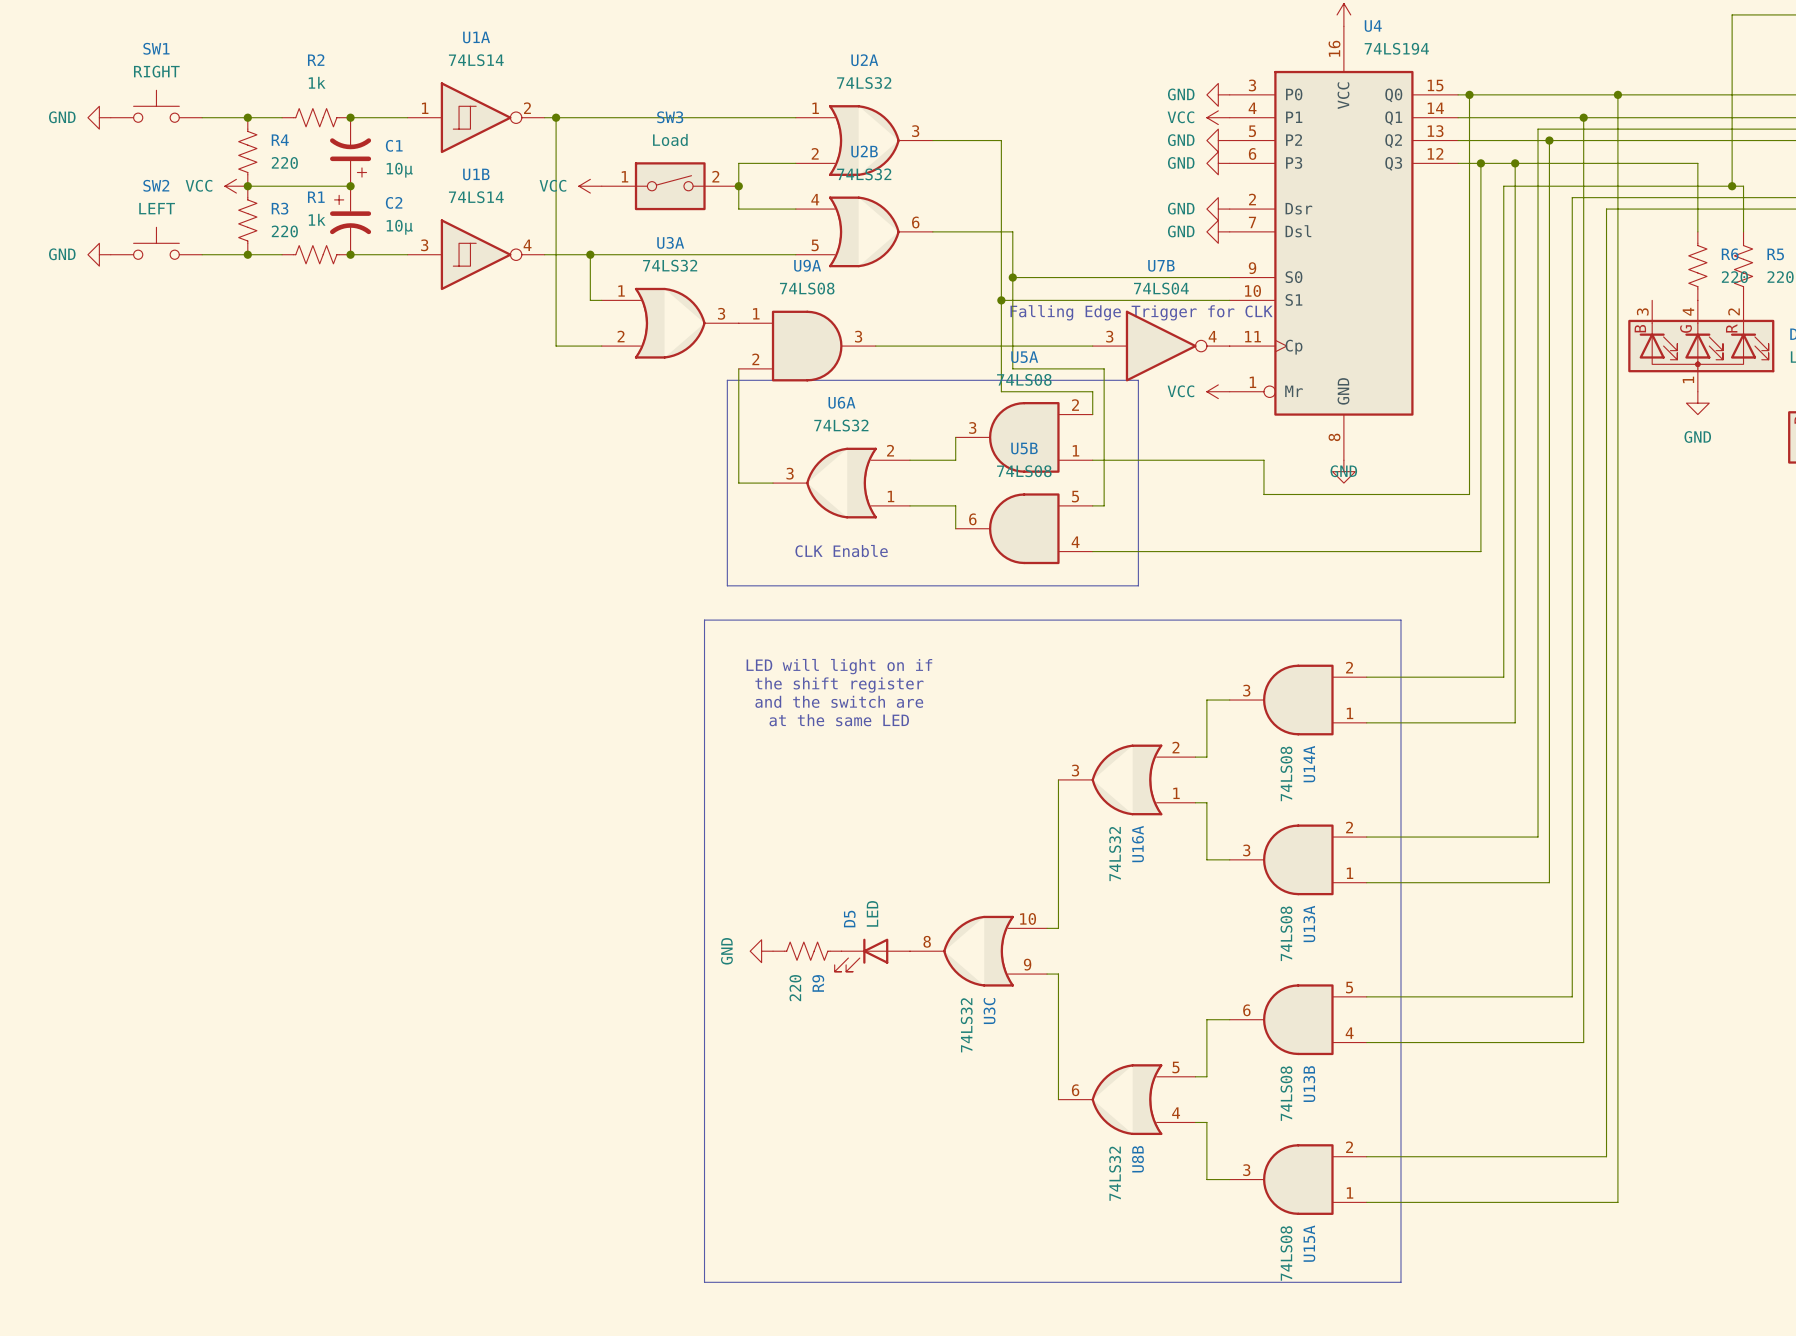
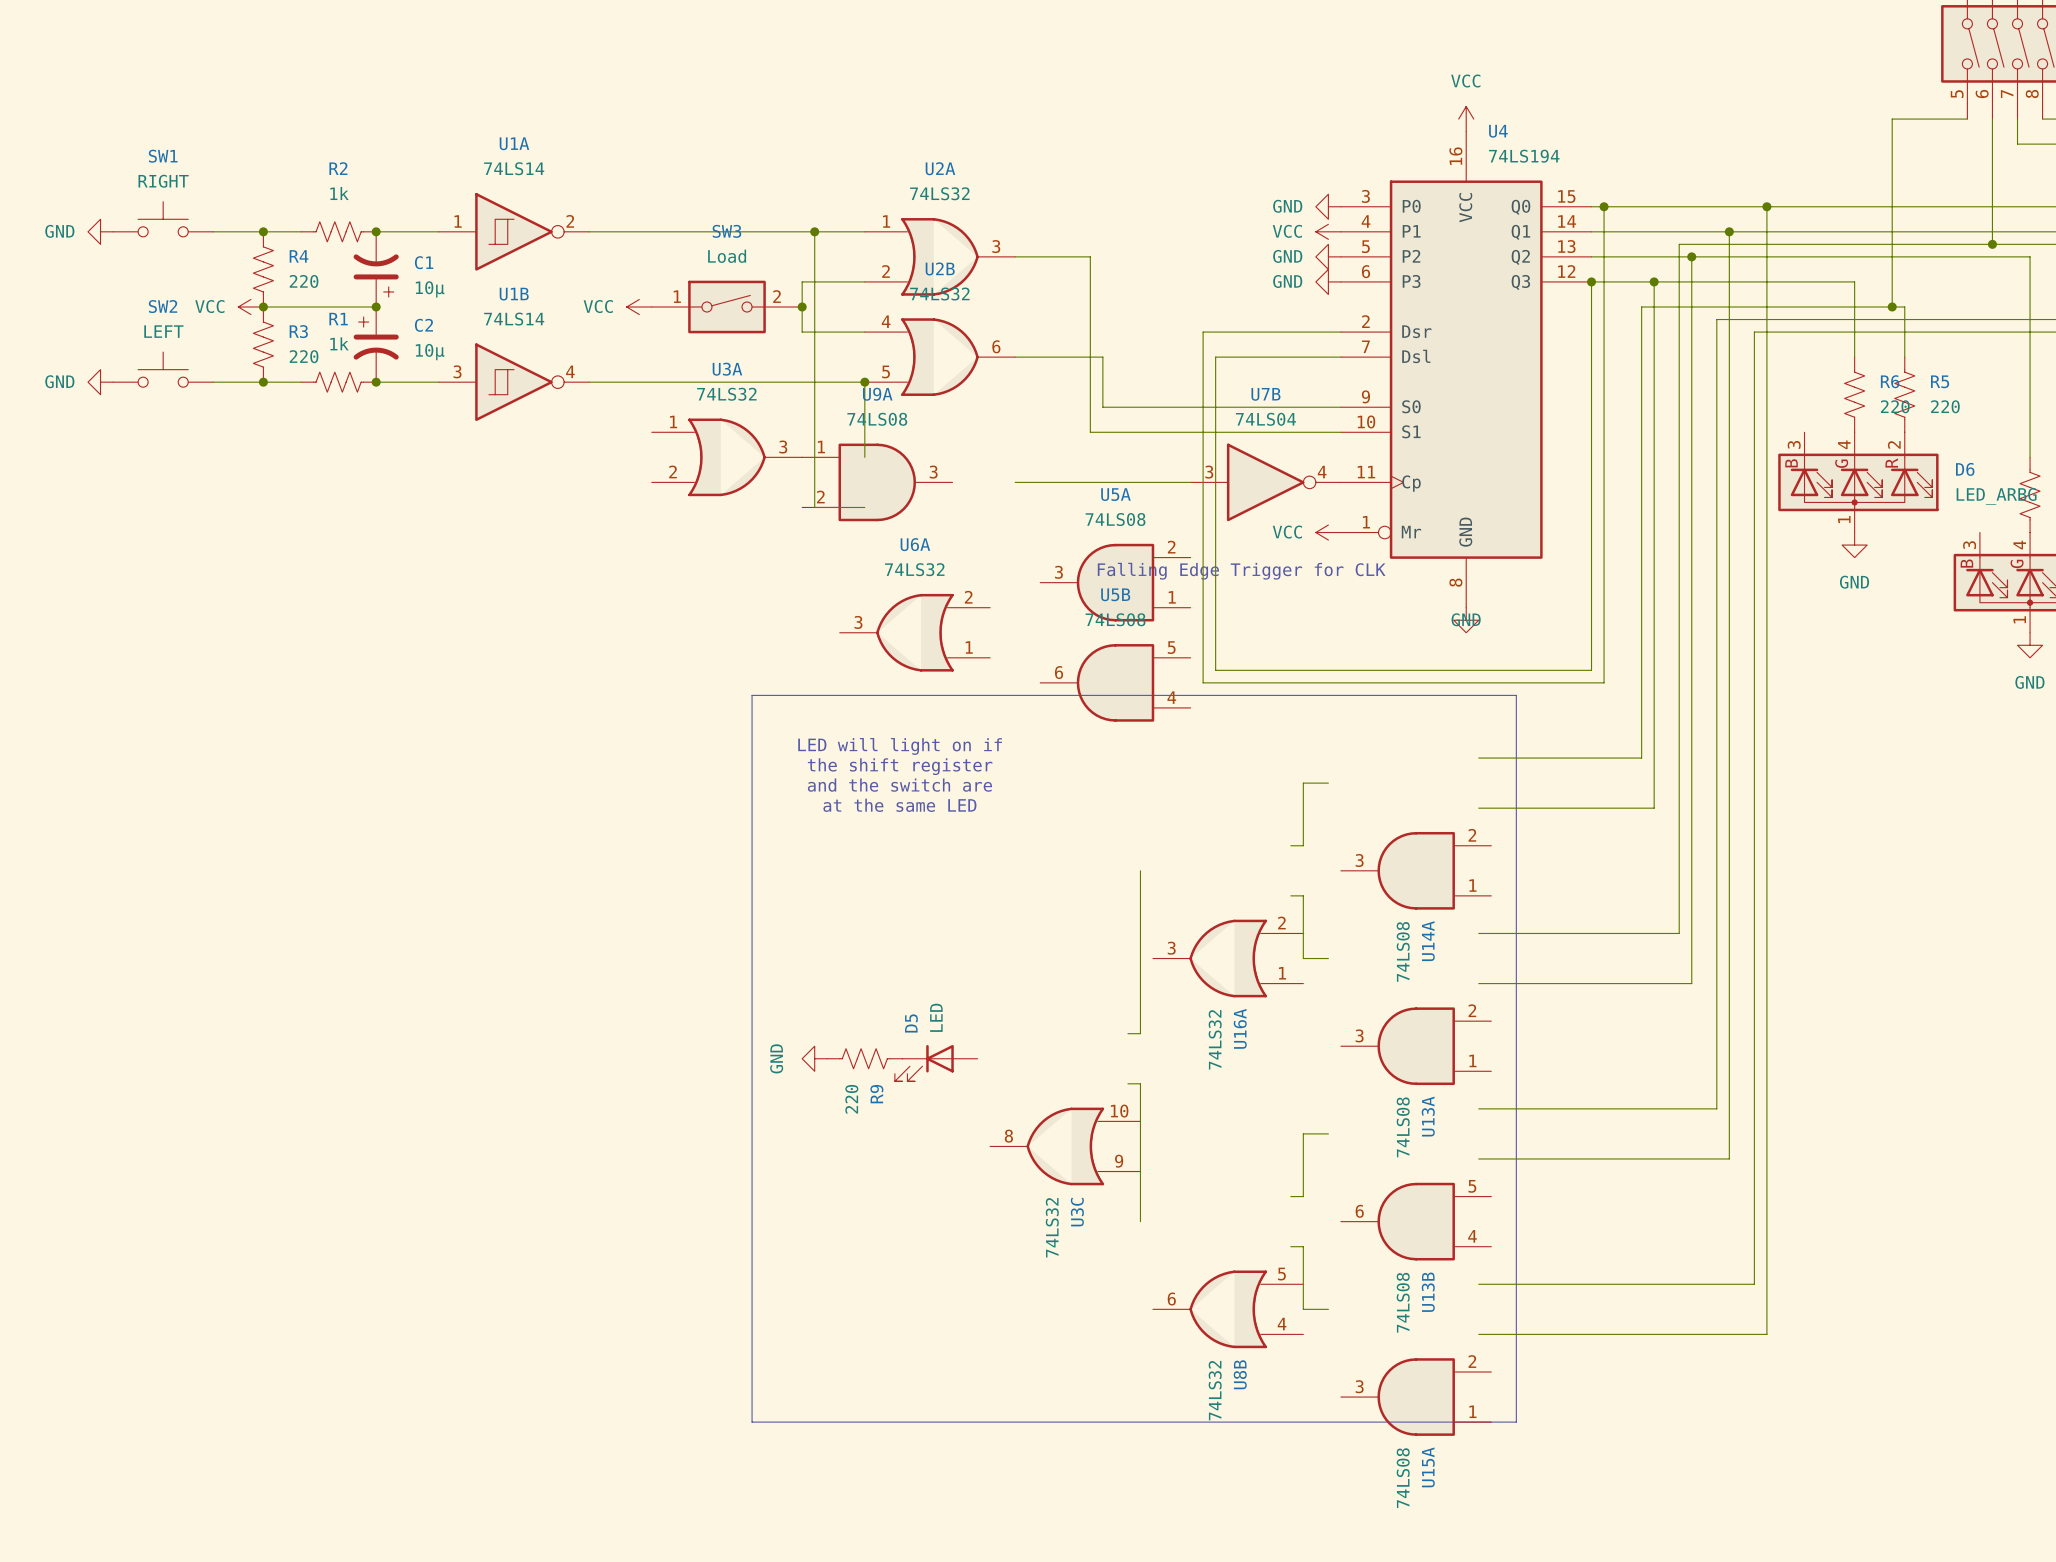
wire: (556, 117) (556, 346) (601, 346) -> none
junction: (556, 117) -> none
wire: none -> (814, 231) (814, 507) (864, 507)
junction: none -> (814, 231)
wire: none -> (1591, 281) (1591, 670) (1215, 670) (1215, 357) (1340, 357)
wire: (1480, 163) (1480, 551) (1092, 551) -> none
junction position: (1480, 163) -> (1591, 281)
power symbol: GND (1218, 209) -> none
power symbol: GND (1218, 231) -> none
wire: (590, 254) (590, 300) (601, 300) -> none
junction: (590, 254) -> none
wire: none -> (864, 382) (864, 457)
junction: none -> (864, 382)
wire: (1012, 277) (1012, 368) (1104, 368) -> (1340, 332) (1203, 332) (1203, 507)
junction: (1012, 277) -> none
wire: (1001, 300) (1001, 391) (1092, 391) (1092, 414) -> none
junction: (1001, 300) -> none
text position: Falling Edge Trigger for CLK (1141, 312) -> Falling Edge Trigger for CLK (1241, 571)
wire: (875, 346) (932, 346) -> none
wire: (738, 368) (738, 483) (773, 483) -> none
line: (727, 380) (1138, 380) (1138, 585) (727, 585) (727, 380) -> none
wire: (955, 437) (955, 460) (910, 460) -> none
wire: (1092, 460) (1263, 460) (1263, 494) (1469, 494) -> (1203, 657) (1203, 682) (1604, 682) (1604, 645)
wire: (910, 505) (955, 505) (955, 528) -> none
wire: (1092, 505) (1104, 505) -> none
text: CLK Enable (841, 551) -> none
wire: (1503, 597) (1503, 677) (1366, 677) -> (1641, 758) (1478, 758)
line: (704, 620) (1401, 620) (1401, 1282) (704, 1282) (704, 620) -> (752, 695) (1516, 695) (1516, 1422) (752, 1422) (752, 695)
wire: (1515, 642) (1515, 722) (1366, 722) -> (1654, 808) (1478, 808)
text position: LED will light on if (839, 666) -> LED will light on if (900, 746)
text position: the shift register (839, 685) -> the shift register (900, 766)
wire: (1229, 700) (1206, 700) (1206, 757) (1195, 757) -> (1328, 783) (1303, 783) (1303, 845) (1290, 845)
text position: and the switch are (839, 701) -> and the switch are (899, 785)
text position: at the same LED (839, 720) -> at the same LED (899, 805)
wire: (1538, 757) (1538, 837) (1366, 837) -> (1679, 933) (1478, 933)
wire: (1058, 779) (1058, 928) (1047, 928) -> (1140, 870) (1140, 1033) (1127, 1033)
wire: (1195, 802) (1206, 802) (1206, 859) (1229, 859) -> (1290, 895) (1303, 895) (1303, 958) (1328, 958)
wire: (1549, 802) (1549, 882) (1366, 882) -> (1691, 983) (1478, 983)
wire: (1572, 916) (1572, 996) (1366, 996) -> (1716, 1108) (1478, 1108)
power symbol position: GND (761, 951) -> GND (814, 1058)
R9 position: (807, 951) -> (864, 1058)
D5 position: (872, 955) -> (936, 1063)
wire: (1583, 962) (1583, 1042) (1366, 1042) -> (1729, 1158) (1478, 1158)
wire: (1047, 974) (1058, 974) (1058, 1099) -> (1127, 1083) (1140, 1083) (1140, 1221)
wire: (1229, 1019) (1206, 1019) (1206, 1076) (1195, 1076) -> (1328, 1133) (1303, 1133) (1303, 1196) (1290, 1196)
wire: (1606, 1076) (1606, 1156) (1366, 1156) -> (1754, 1284) (1478, 1284)
wire: (1195, 1122) (1206, 1122) (1206, 1179) (1229, 1179) -> (1290, 1246) (1303, 1246) (1303, 1309) (1328, 1309)
wire: (1617, 1122) (1617, 1202) (1366, 1202) -> (1766, 1334) (1478, 1334)

